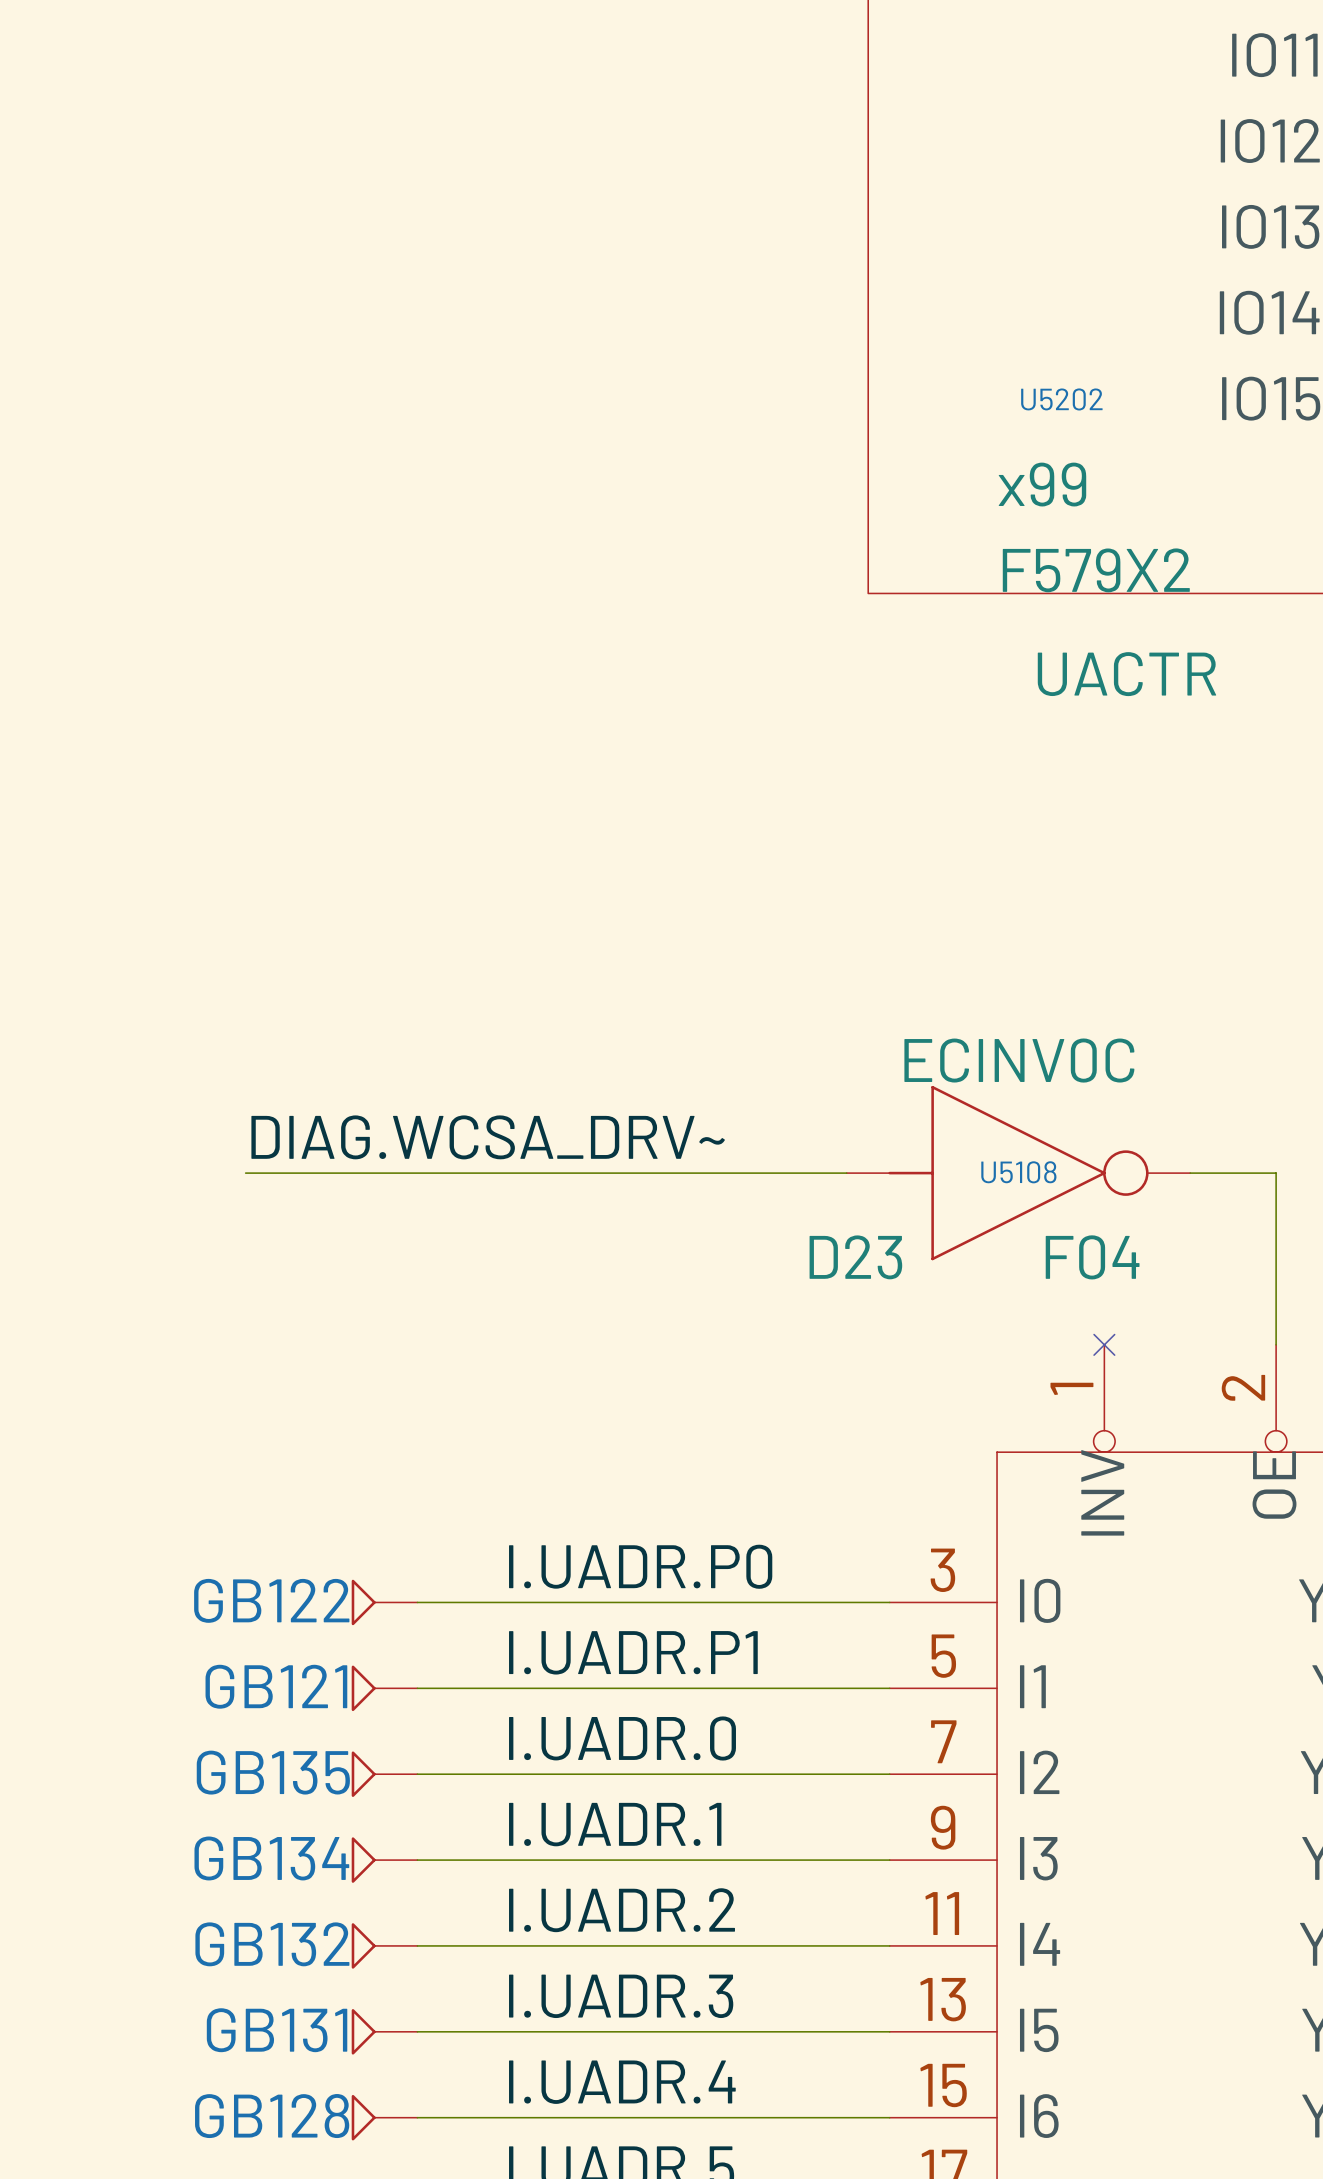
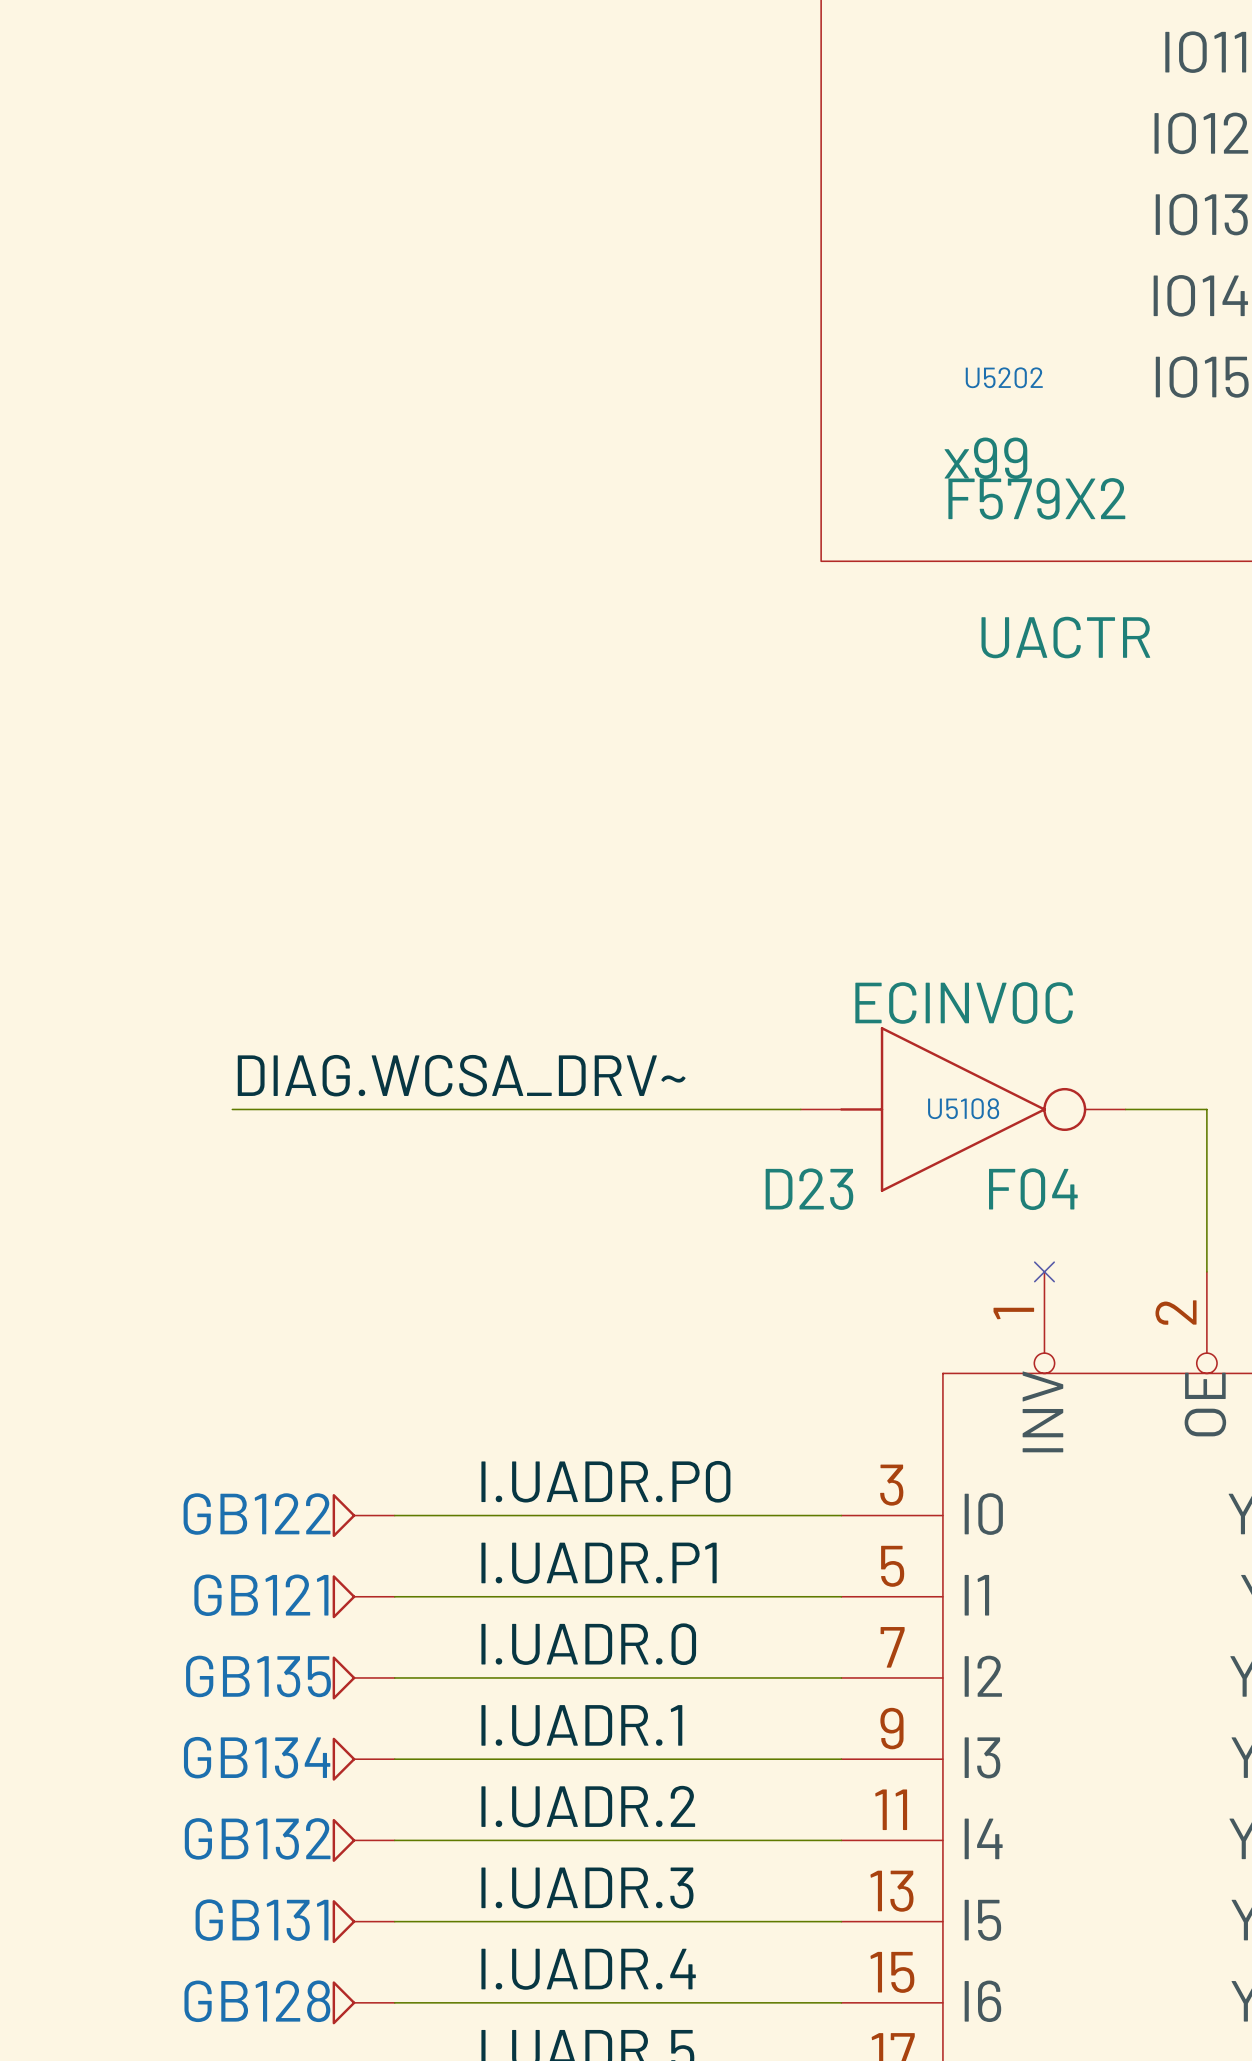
U5202 value position: F579X2 (1096, 570) -> F579X2 (1036, 498)

